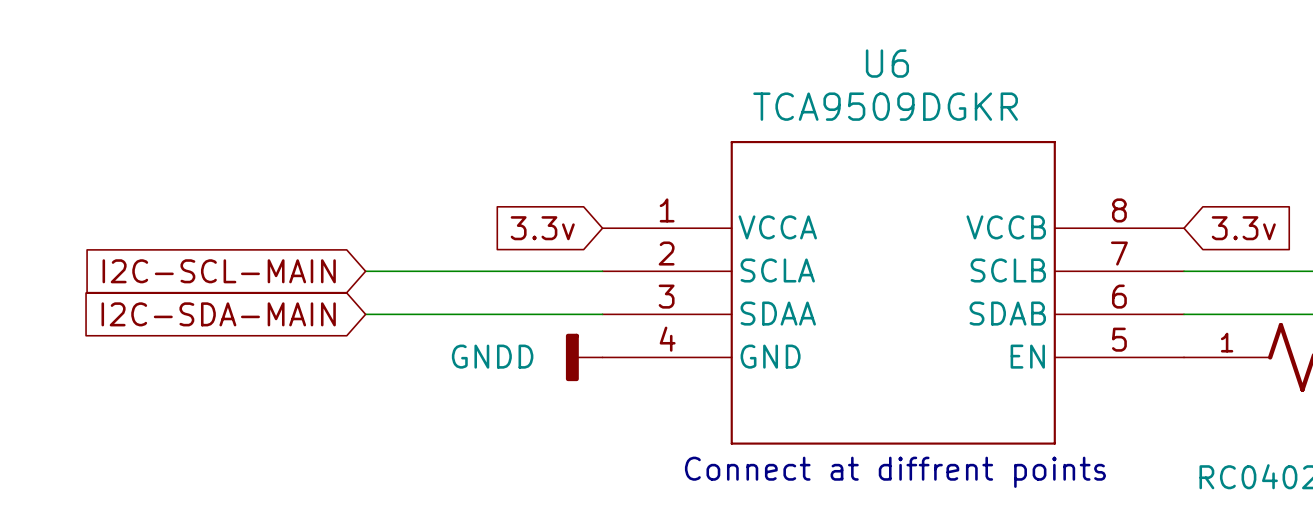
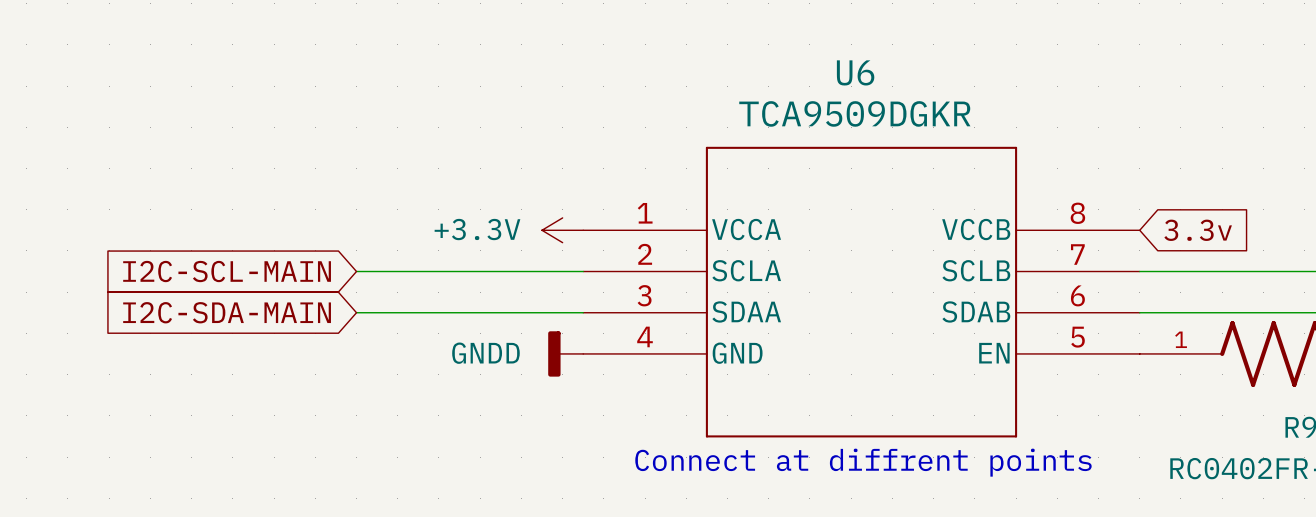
global label: 3.3v (542, 228) -> none
power symbol: none -> +3.3V (562, 230)

